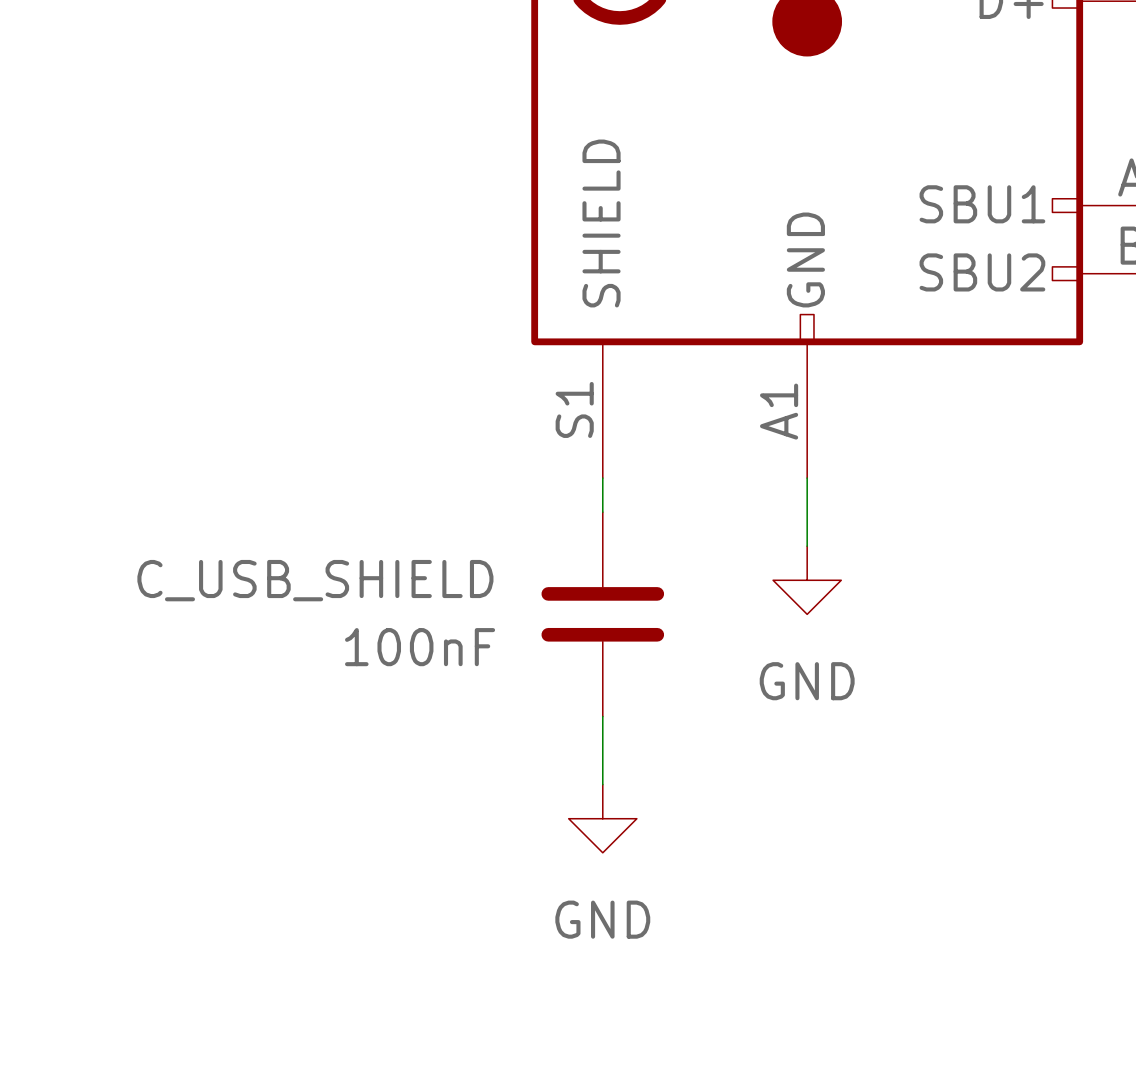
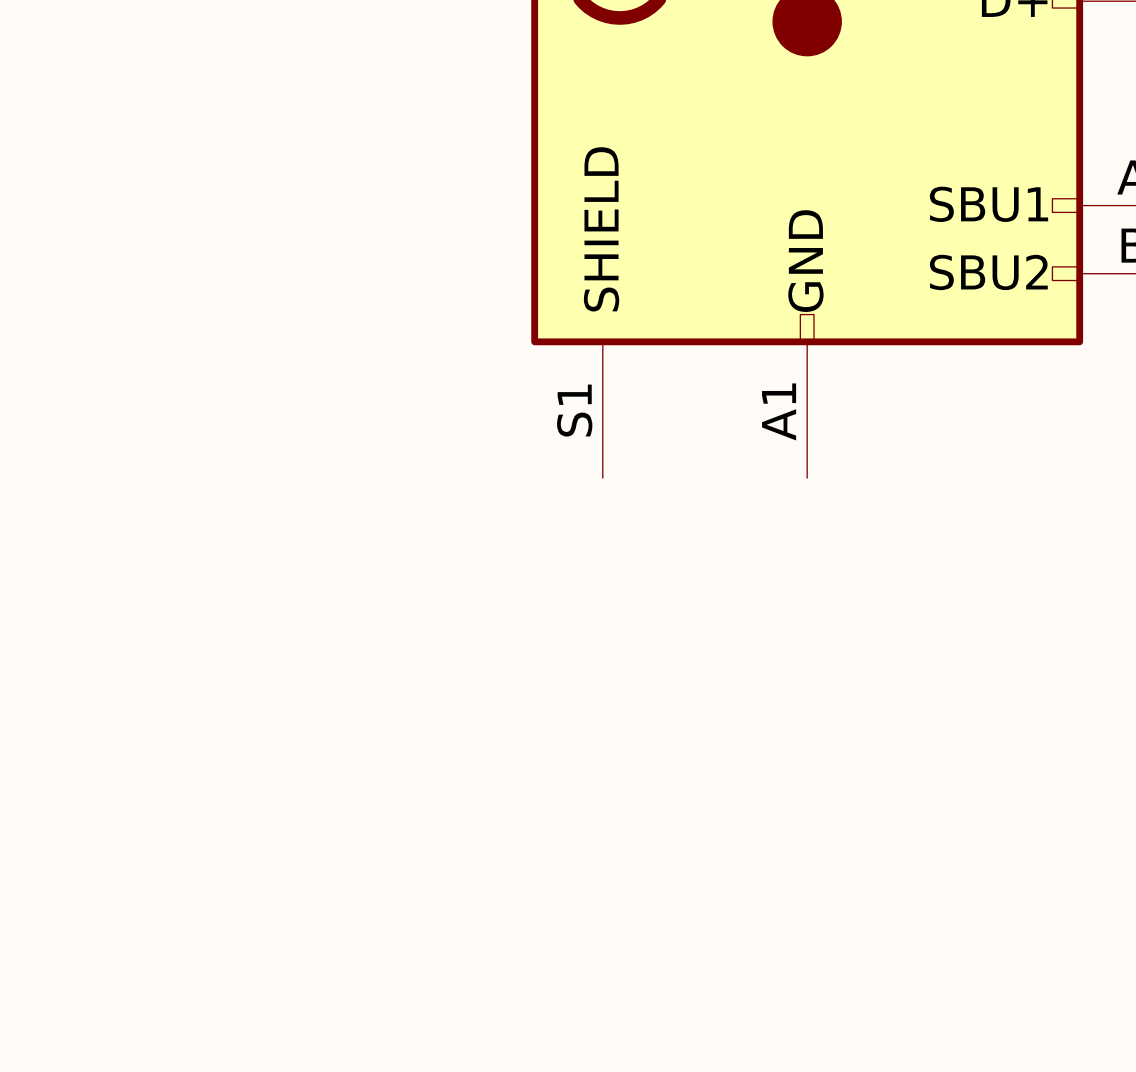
wire: (602, 478) (602, 512) -> none
wire: (807, 478) (807, 546) -> none
power symbol: GND (807, 580) -> none
C_USB_SHIELD: 100nF (602, 614) -> none
wire: (602, 716) (602, 784) -> none
power symbol: GND (602, 818) -> none

